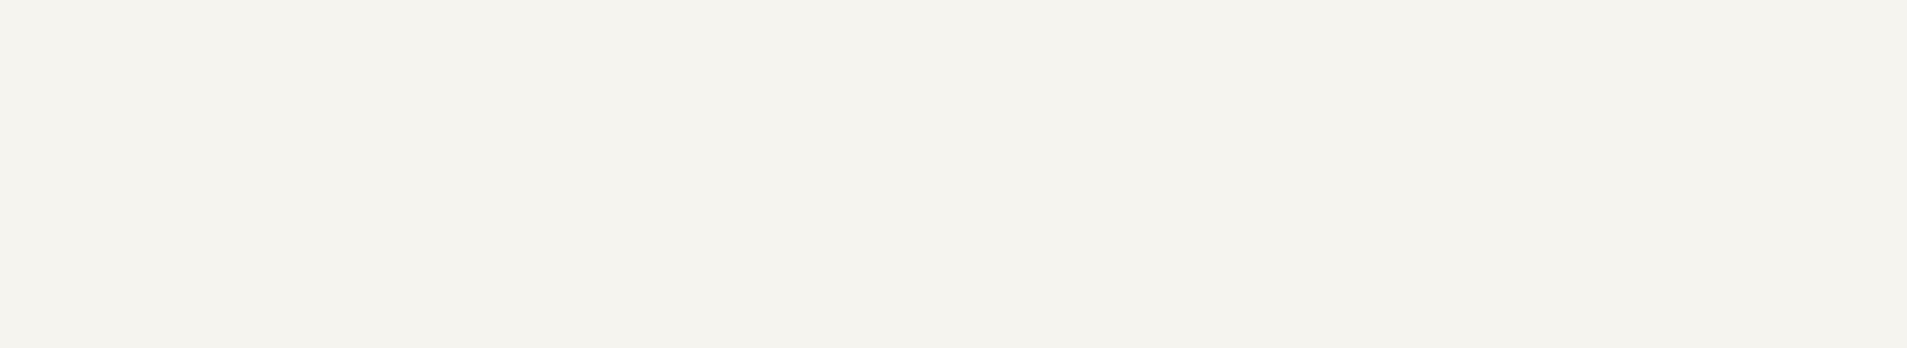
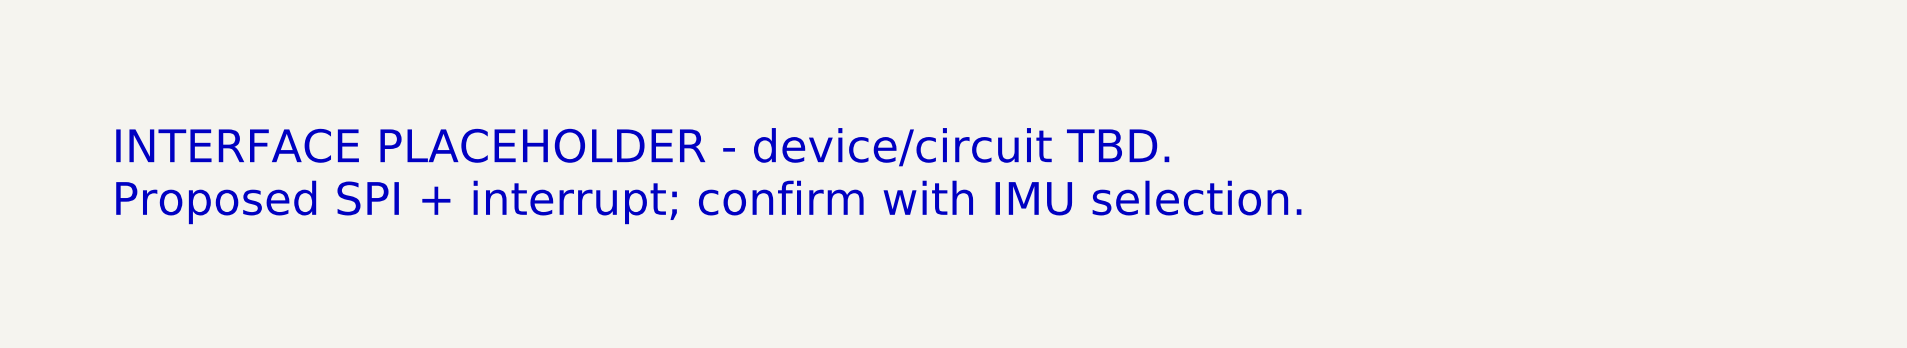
text: none -> INTERFACE PLACEHOLDER - device/circuit TBD. (642, 147)
text: none -> Proposed SPI + interrupt; confirm with IMU selection. (708, 202)

